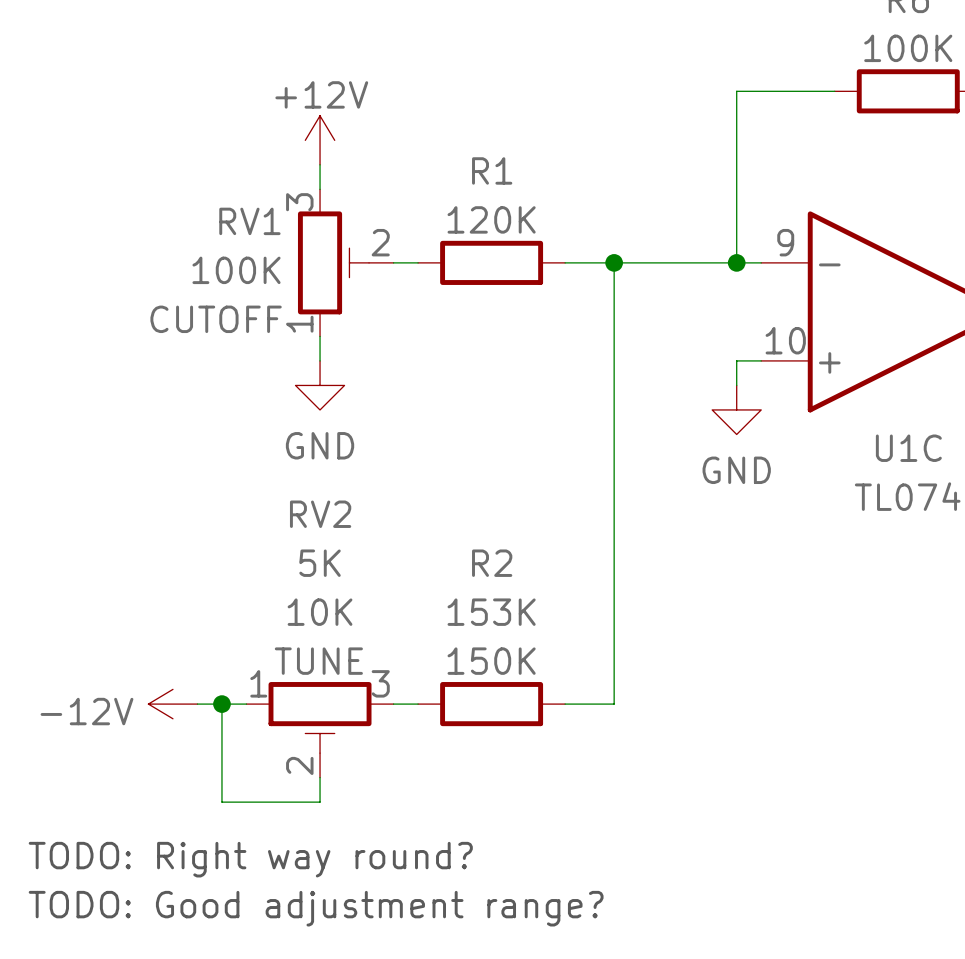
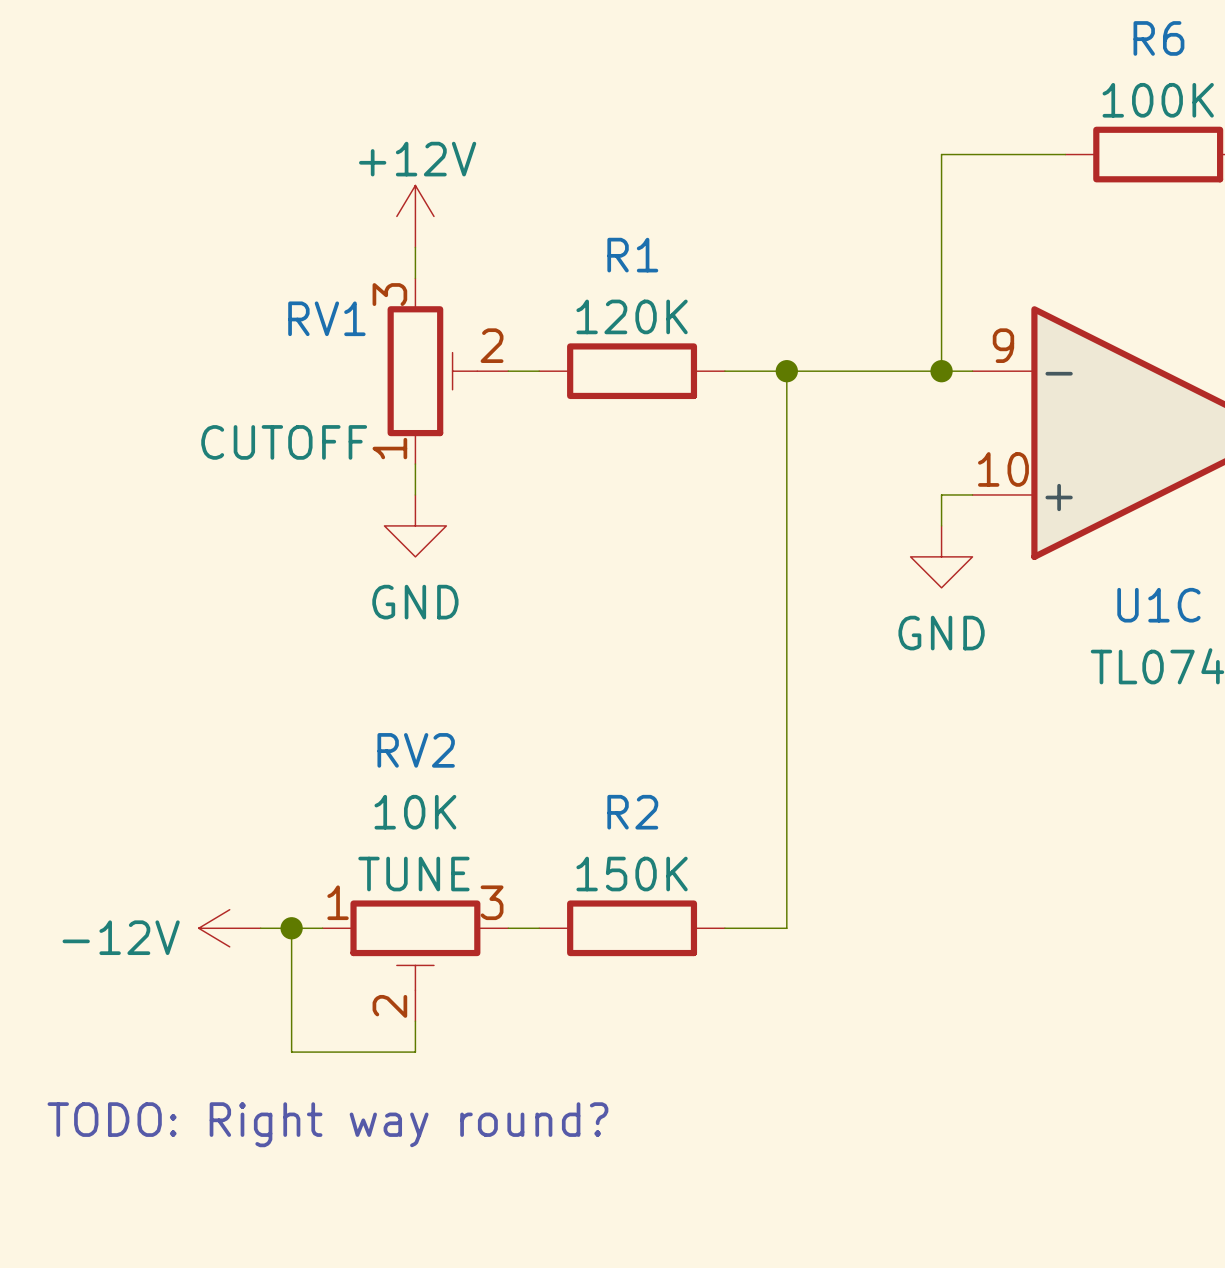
RV1 value: 100K (236, 270) -> none
RV2 name position: RV2 (320, 514) -> RV2 (416, 750)
RV2 value: 5K (320, 563) -> 10K (415, 812)
R2 name position: R2 (492, 563) -> R2 (632, 812)
R2 value: 153K (491, 612) -> 150K (632, 874)
text: TODO: Good adjustment range? (316, 908) -> none

